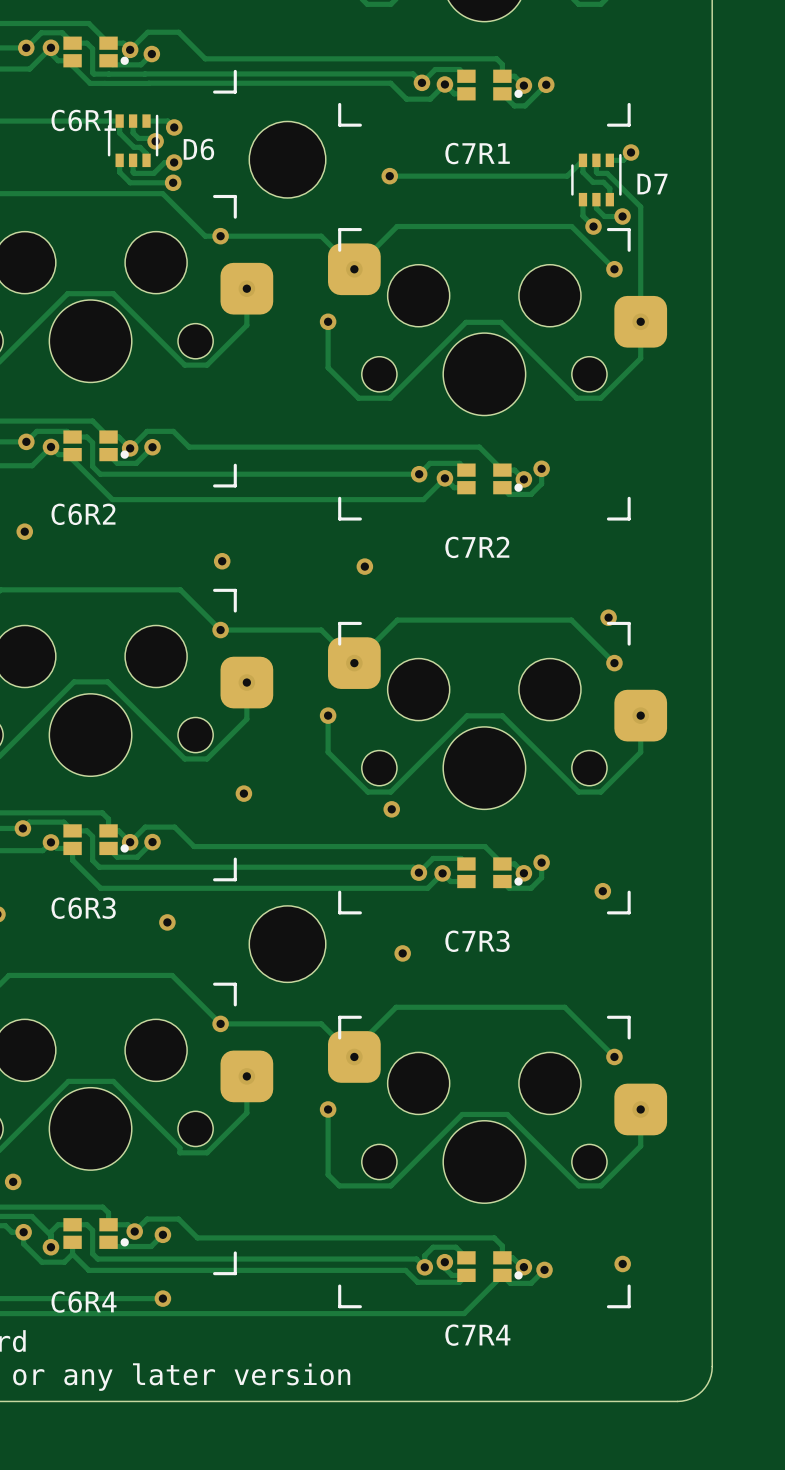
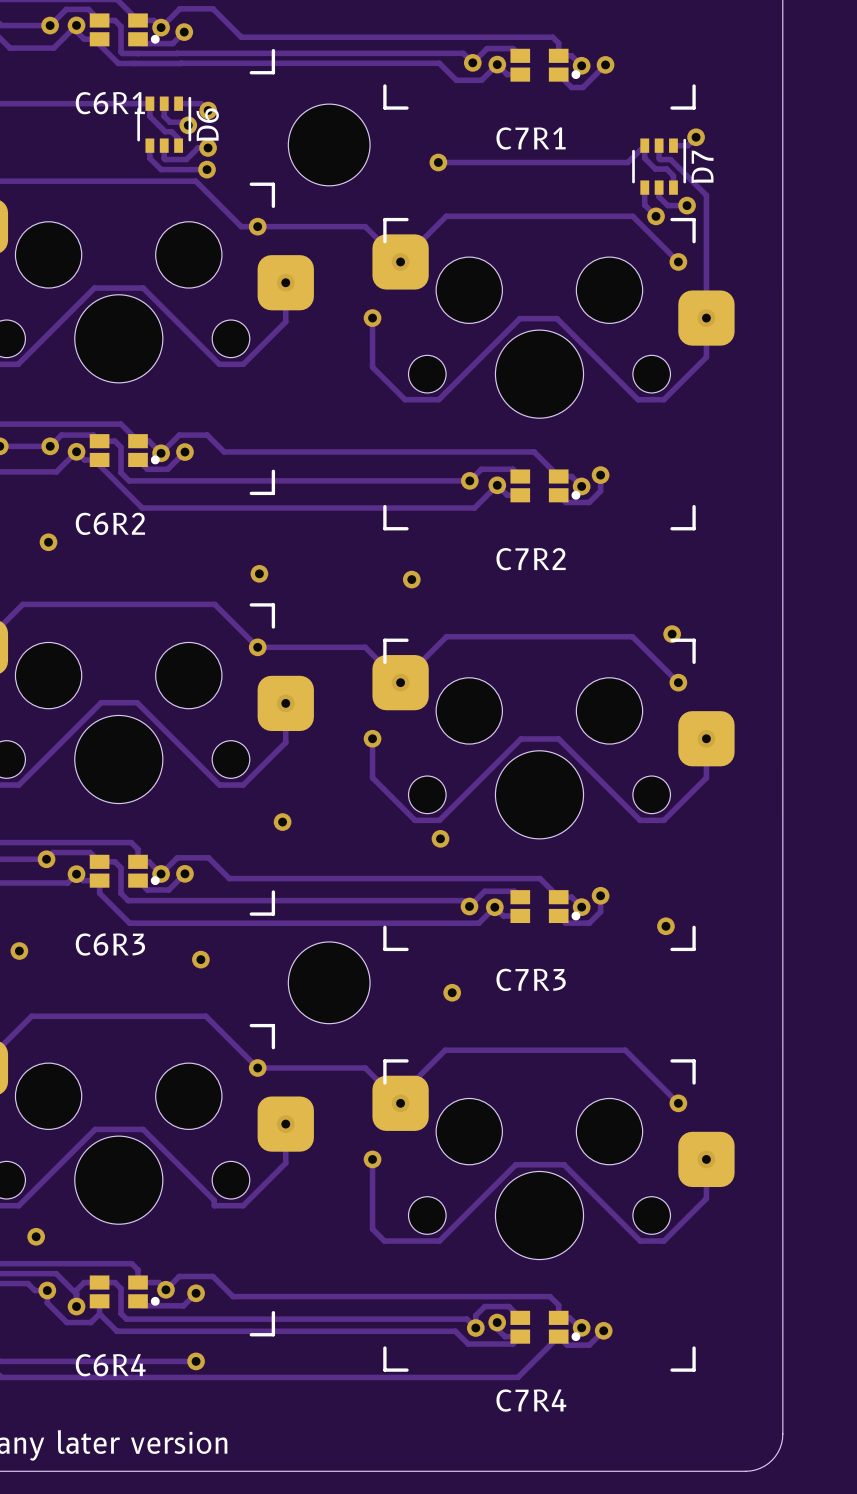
D6 name rotation: 0° (198, 149) -> 90° counterclockwise (207, 124)
D7 name rotation: 0° (652, 184) -> 90° counterclockwise (702, 166)
via: (622, 1263) -> none

